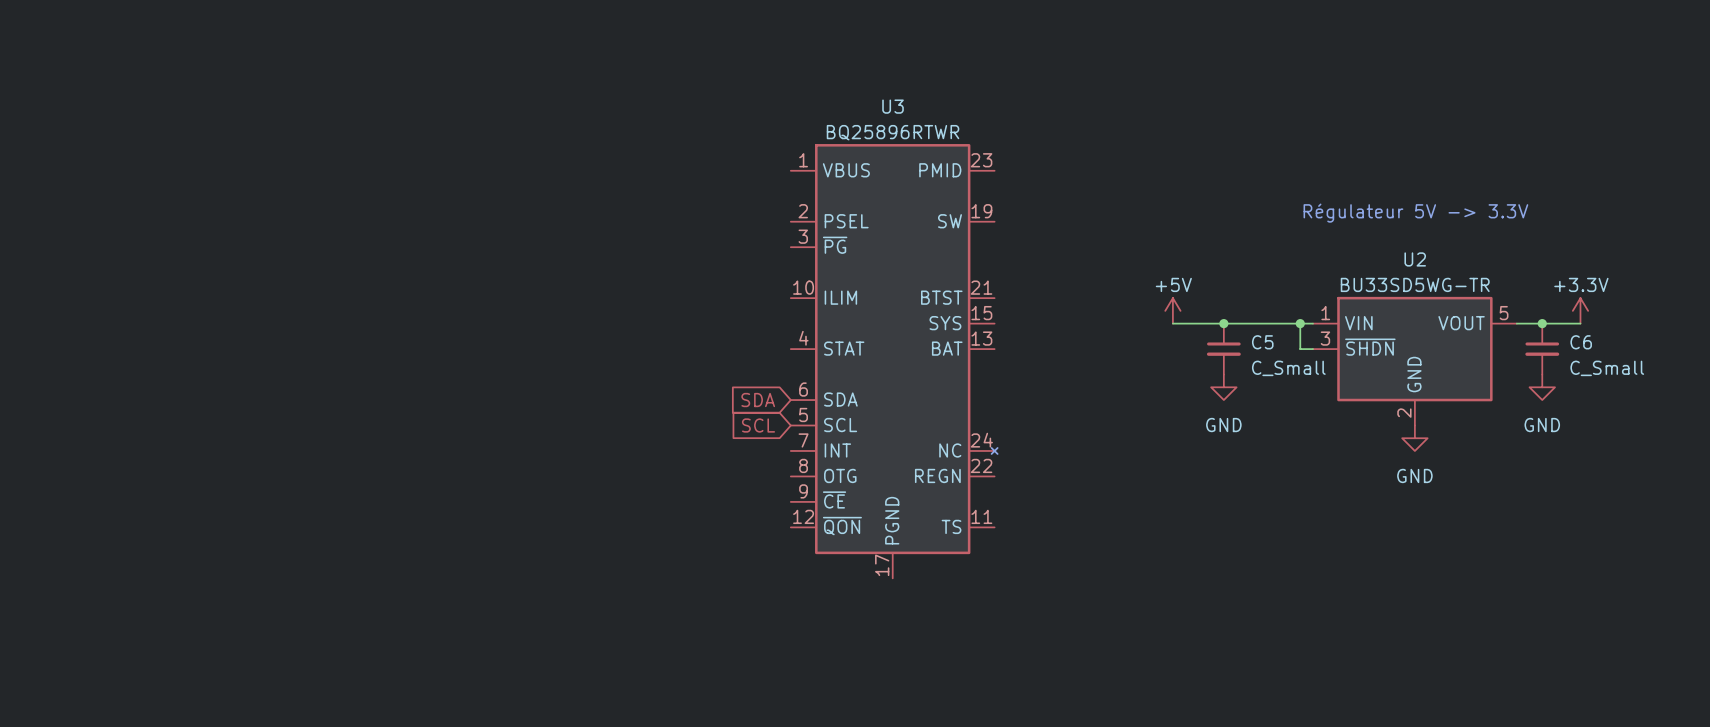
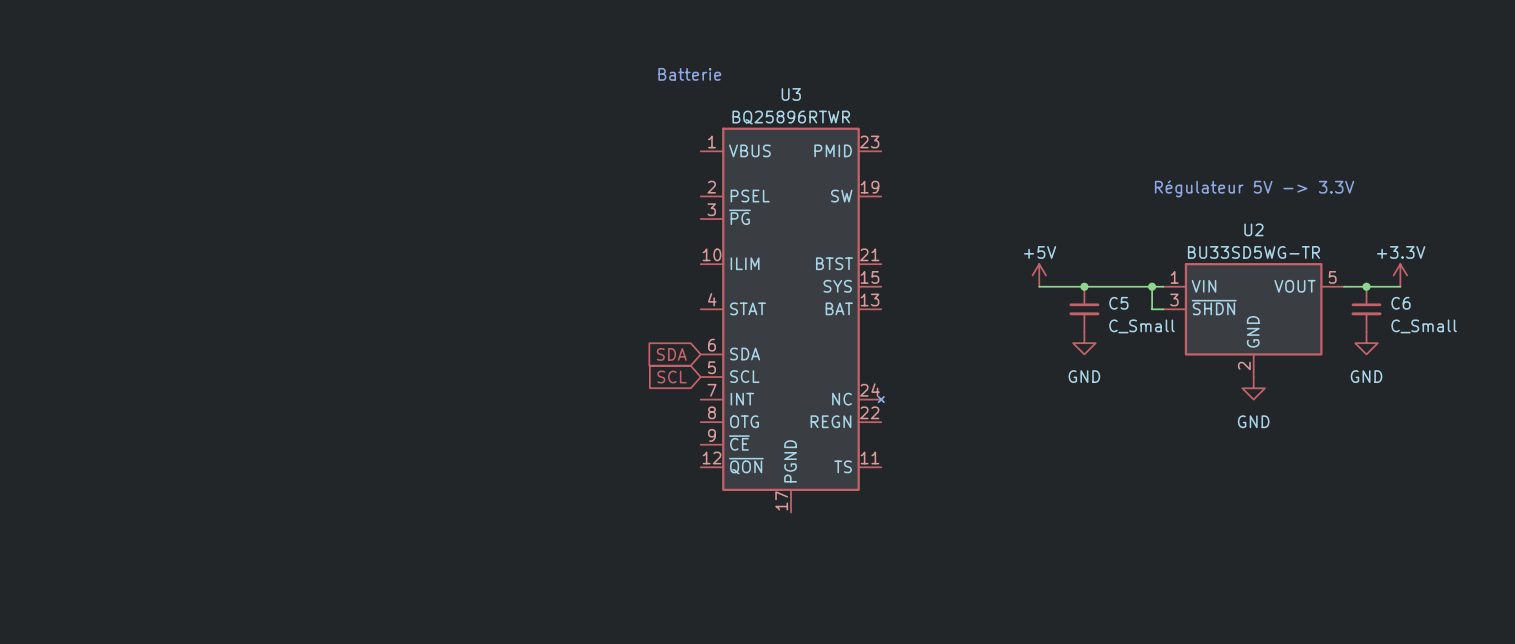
text: none -> Batterie (689, 74)

